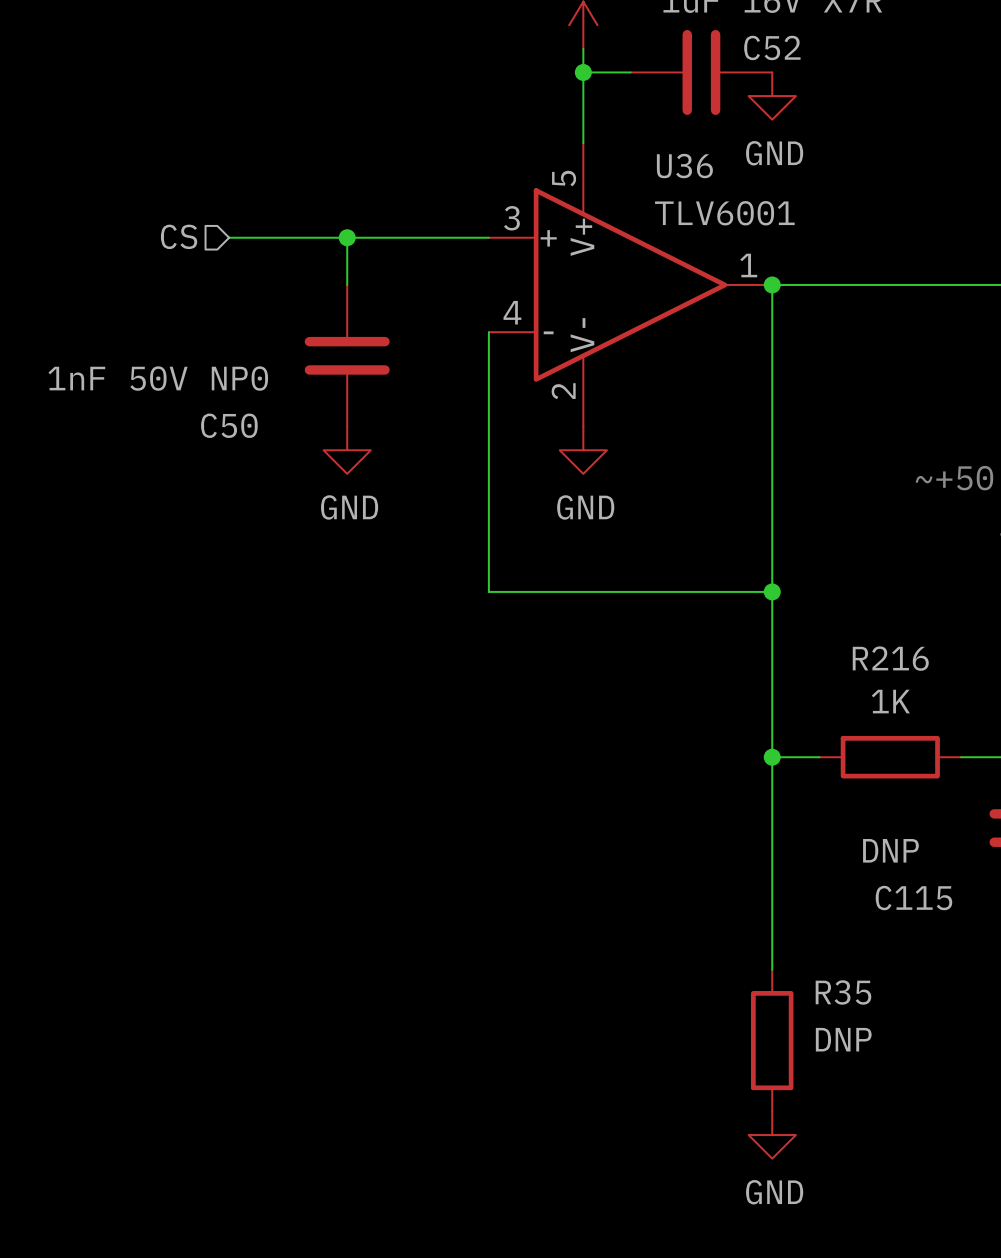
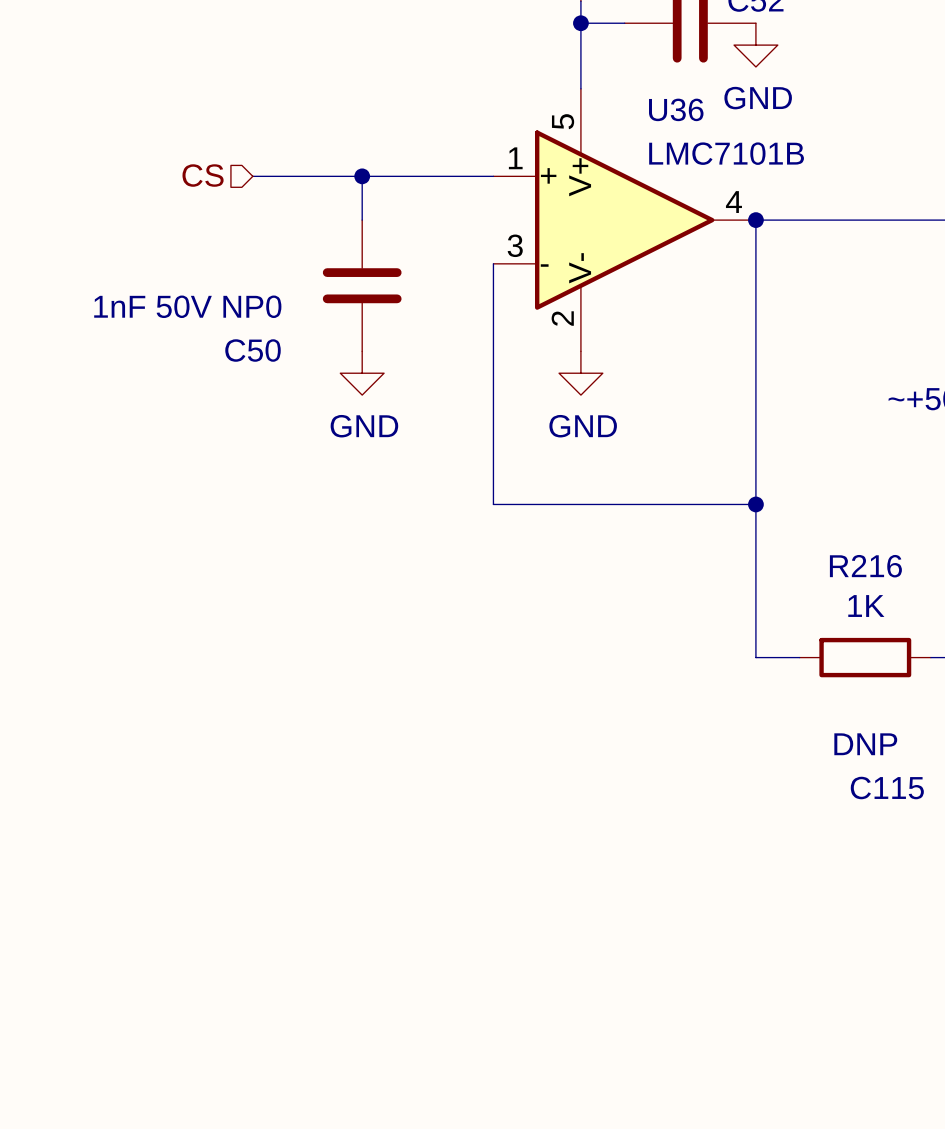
U36 value: TLV6001 (724, 213) -> LMC7101B (726, 153)
U36 pin number: 3 (511, 218) -> 1 (515, 158)
U36 pin number: 1 (748, 265) -> 4 (733, 202)
U36 pin number: 4 (512, 312) -> 3 (515, 245)
wire: (772, 757) (772, 969) -> none
junction: (772, 757) -> none
R35: DNP (772, 1040) -> none
power symbol: GND (772, 1135) -> none

